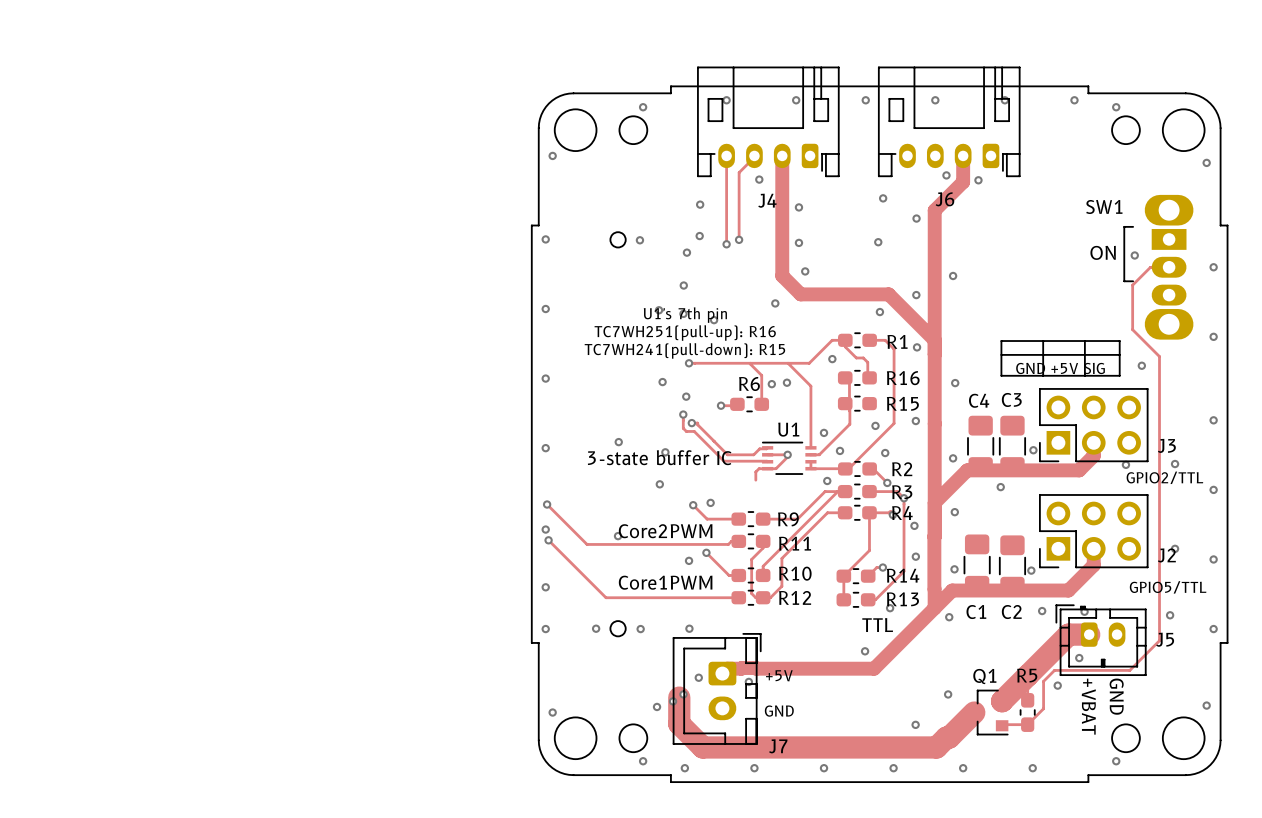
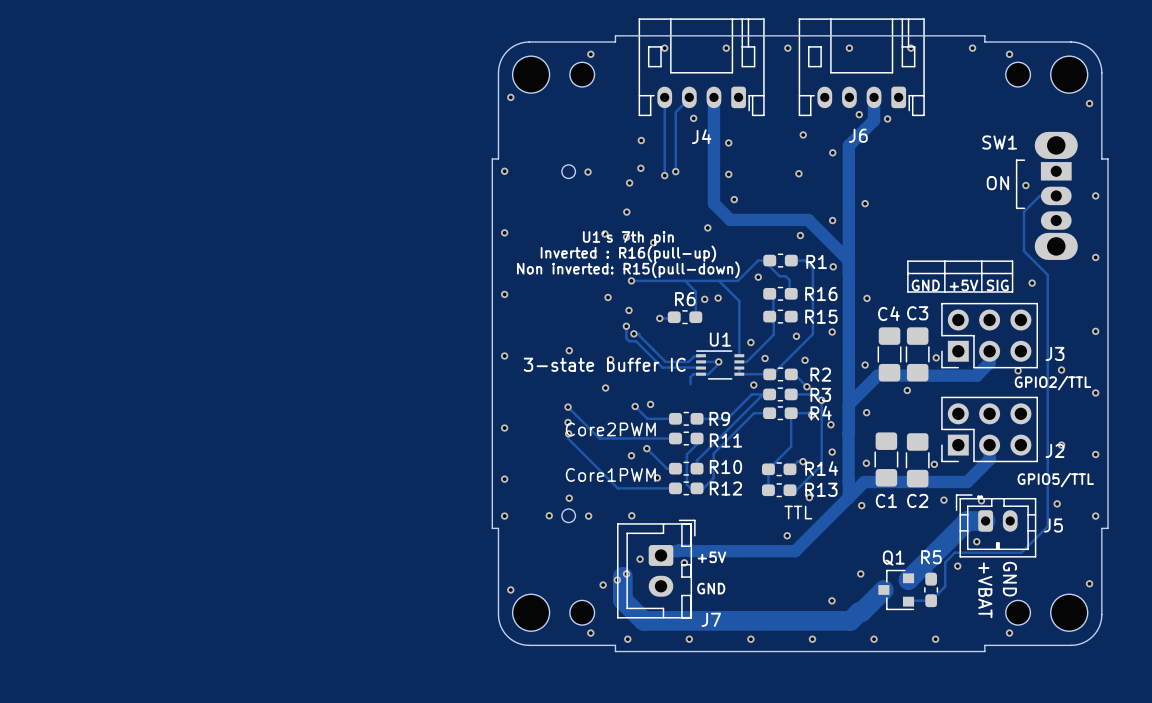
text: TC7WH251(pull-up): R16 (685, 333) -> Inverted : R16(pull-up) (628, 253)
text: TC7WH241(pull-down): R15 (684, 350) -> Non inverted: R15(pull-down) (628, 269)
track: (547, 504) (587, 544) (728, 544) (731, 541) -> (568, 407) (599, 438) (669, 438)
via: (547, 504) -> none
via: none -> (568, 407)
via: none -> (568, 422)
track: (548, 540) (606, 597) (673, 597) -> (568, 438) (617, 488)
via: (548, 540) -> none
via: none -> (657, 477)
via: none -> (569, 498)

